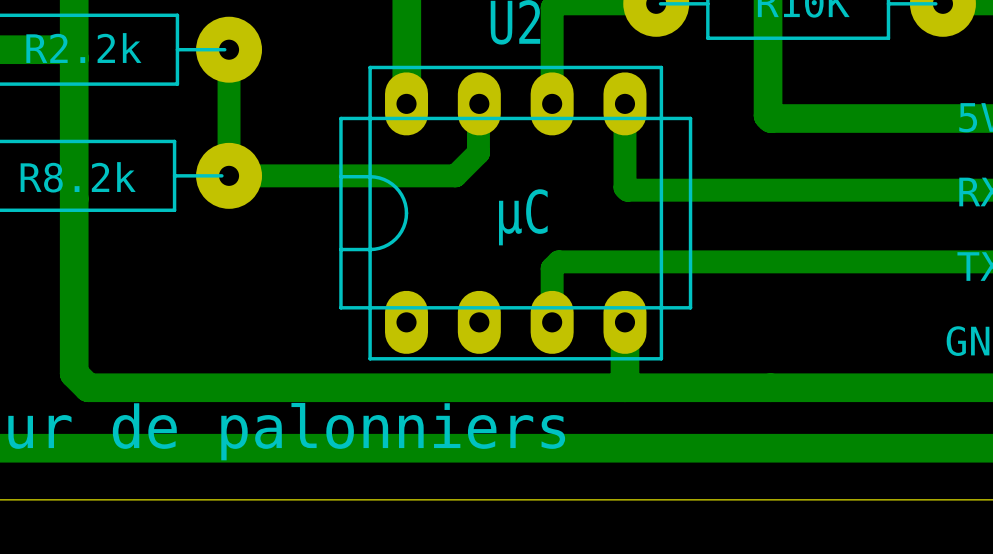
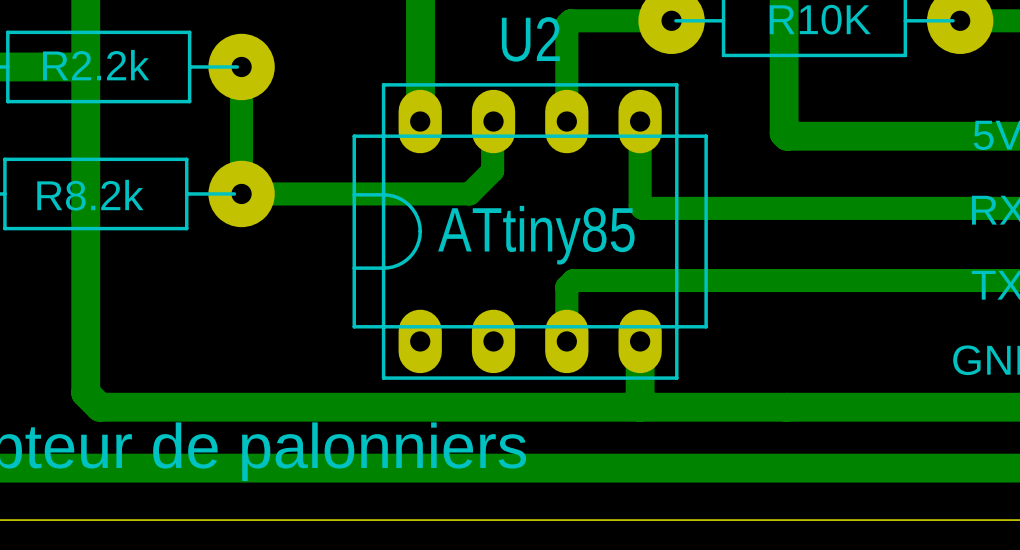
U2 value: µC (523, 217) -> ATtiny85 (536, 235)

